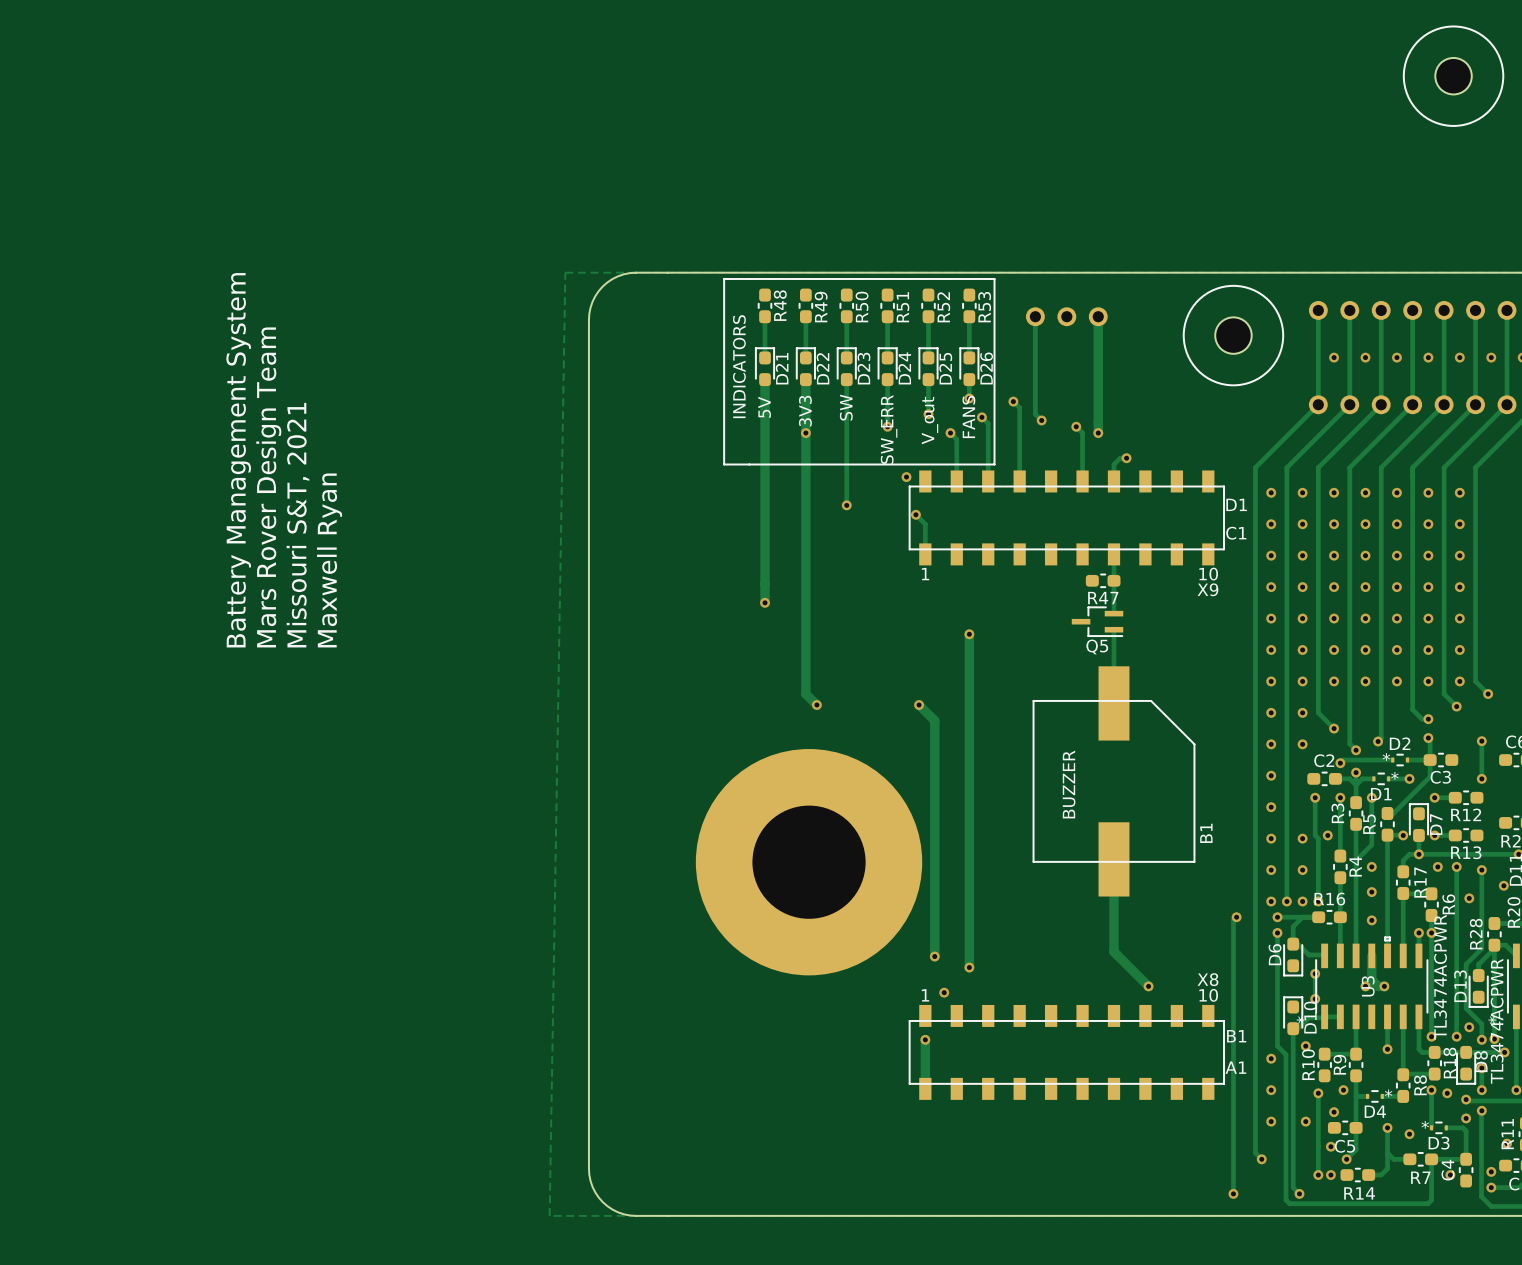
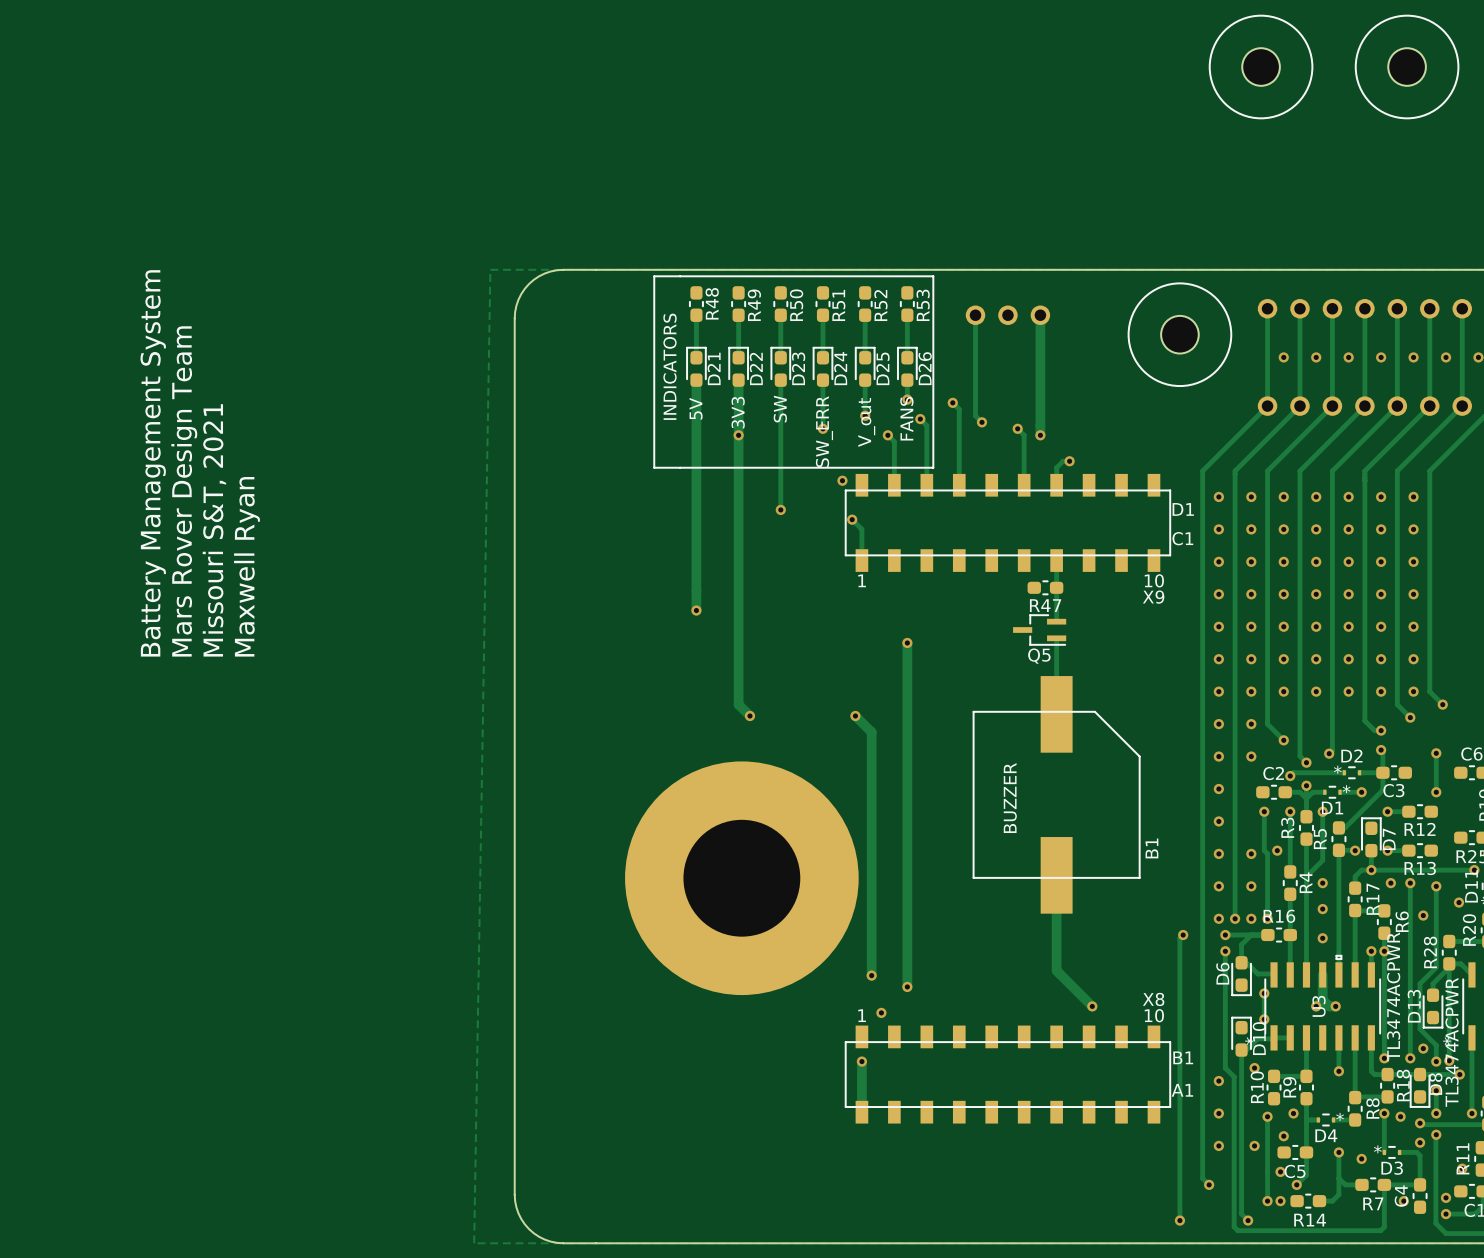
part: none -> (1261, 67)

